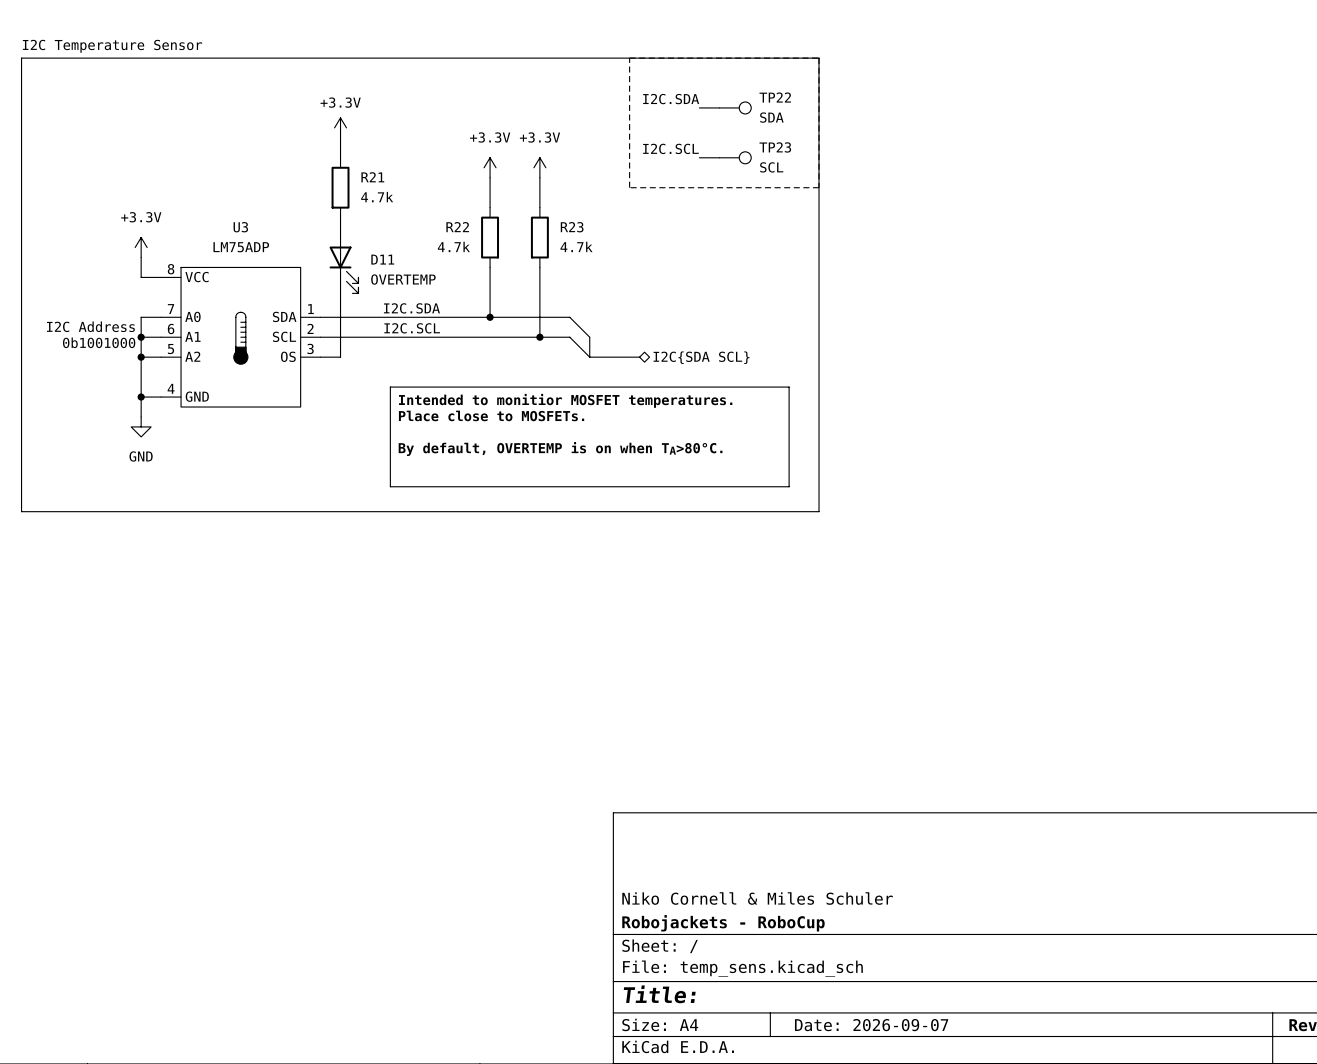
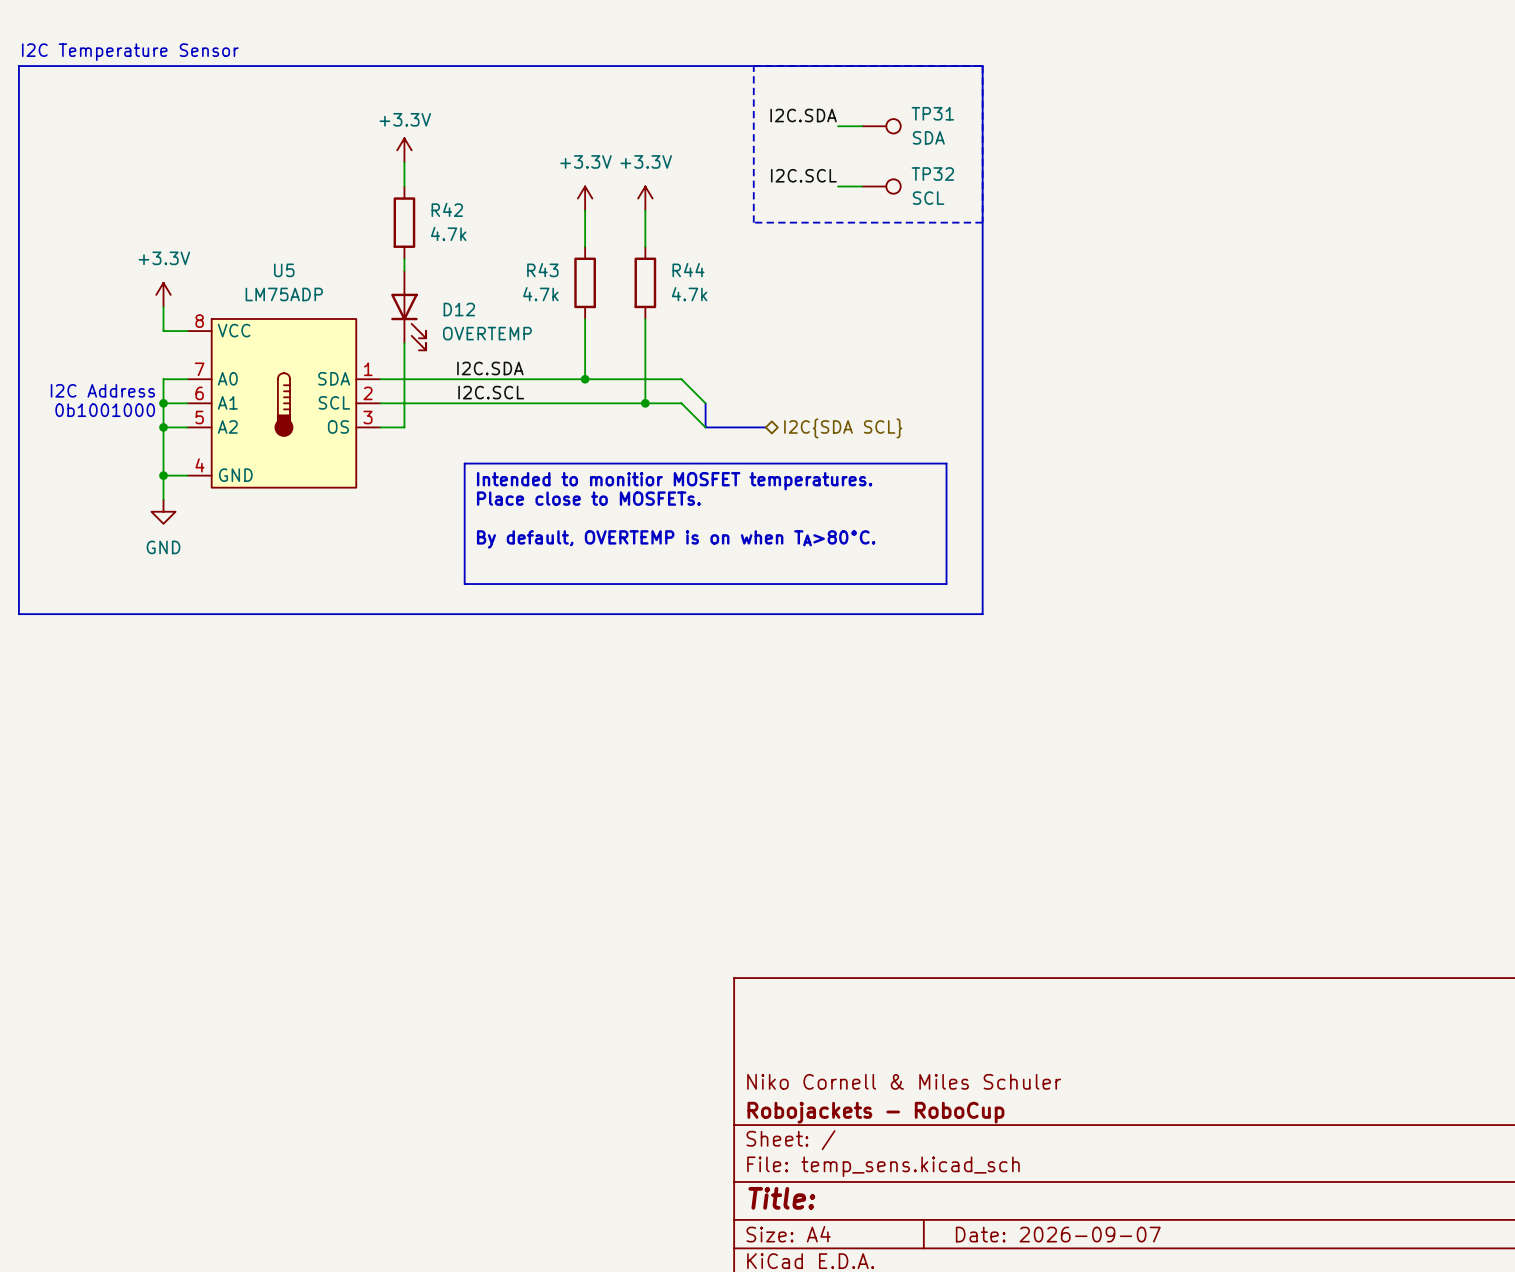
TP22 name: TP22 (775, 97) -> TP31 (932, 113)
TP23 name: TP23 (775, 147) -> TP32 (932, 174)
R21 name: R21 (372, 177) -> R42 (447, 209)
U3 name: U3 (240, 227) -> U5 (284, 270)
R22 name: R22 (457, 227) -> R43 (542, 270)
R23 name: R23 (572, 227) -> R44 (688, 270)
D11 name: D11 (382, 259) -> D12 (459, 309)

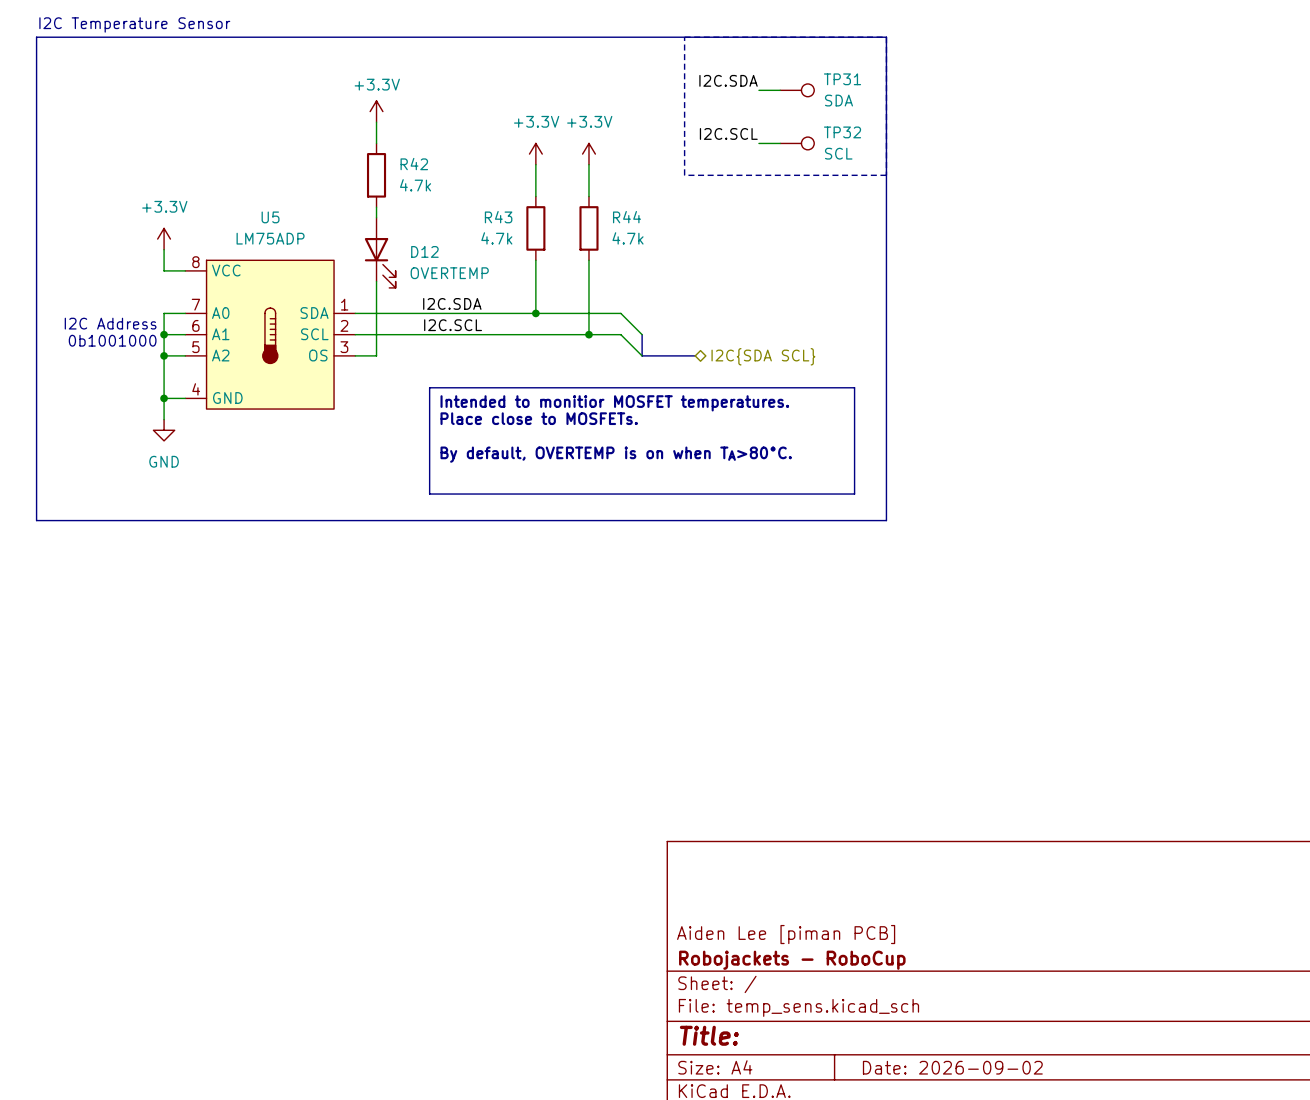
title block: Niko Cornell & Miles Schuler (904, 1081) -> Aiden Lee [piman PCB] (786, 934)
title block: Date: 2026-09-07 (1058, 1234) -> Date: 2026-09-02 (952, 1067)

